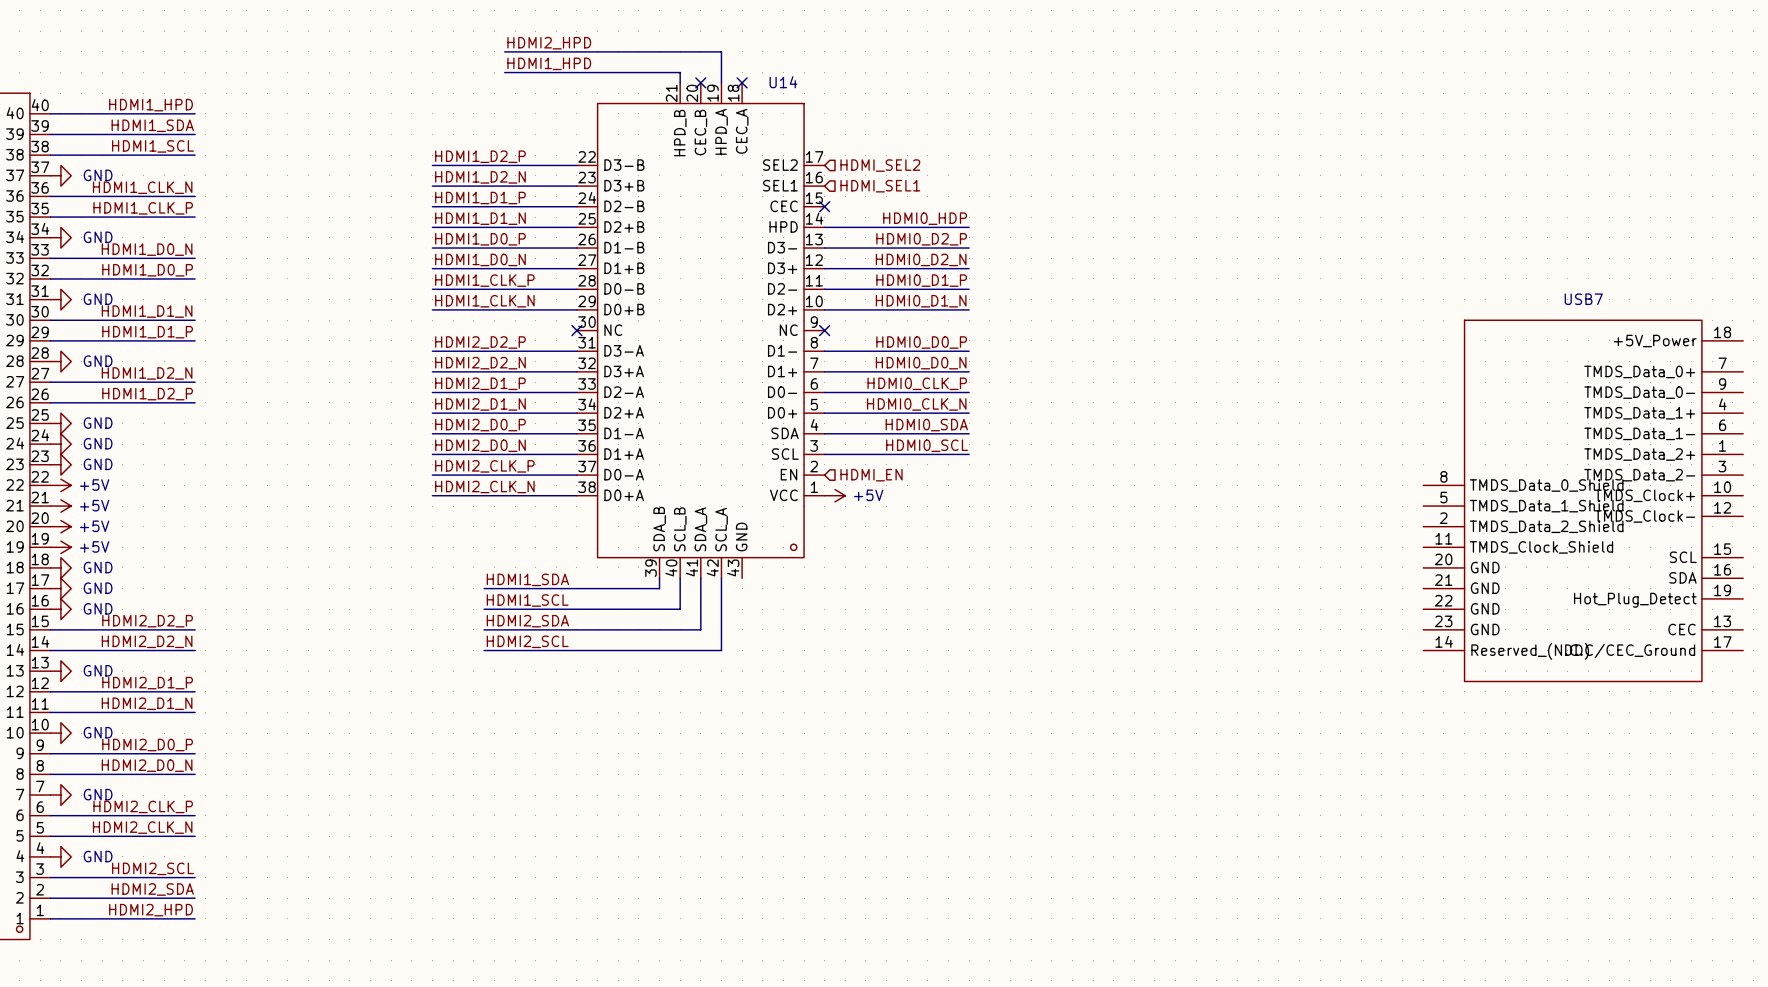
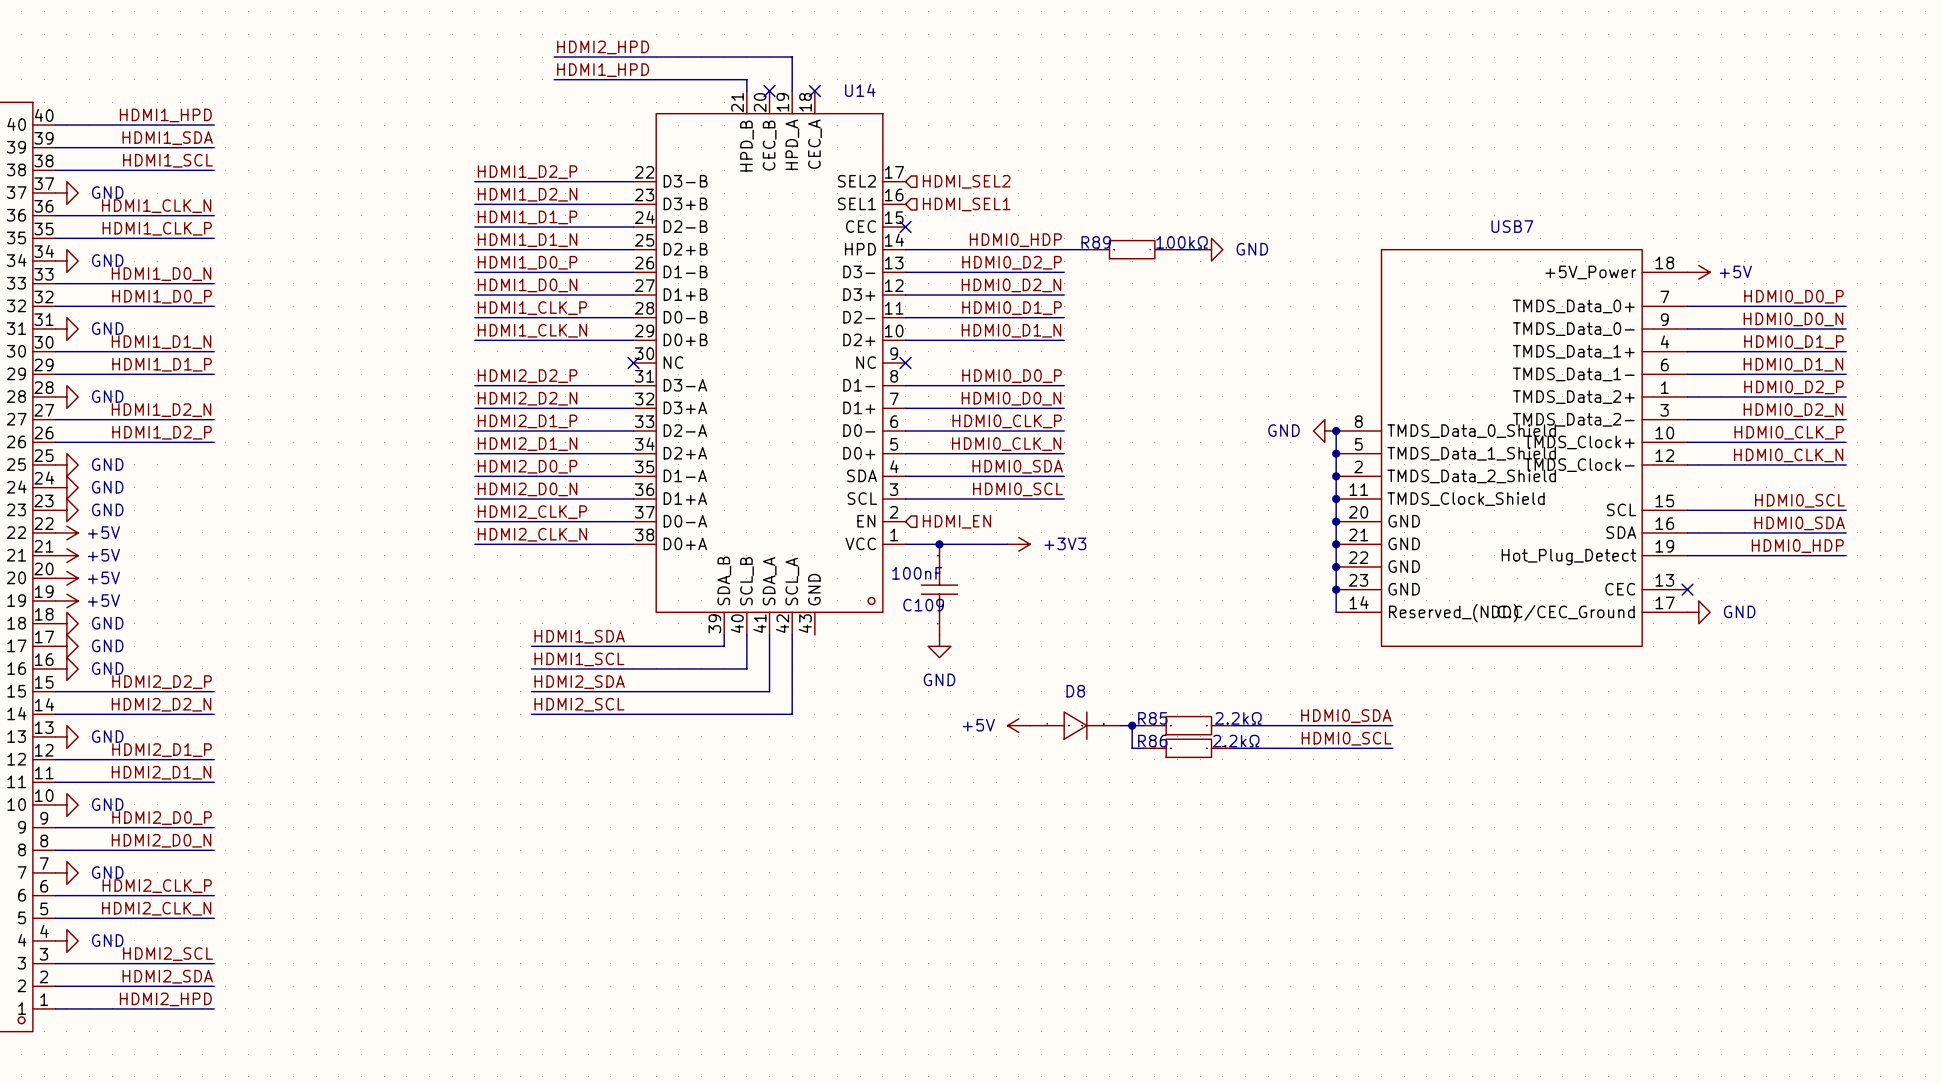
wire: none -> (1064, 249) (1086, 249)
R89: none -> 100kΩ (1132, 249)
wire: none -> (1177, 249) (1200, 249)
power symbol: none -> GND (1211, 249)
power symbol: none -> +5V (1698, 272)
label: none -> HDMI0_D0_P (1793, 296)
wire: none -> (1687, 306) (1846, 306)
label: none -> HDMI0_D0_N (1793, 319)
wire: none -> (1687, 328) (1846, 328)
label: none -> HDMI0_D1_P (1793, 342)
label: none -> HDMI0_D1_N (1793, 364)
wire: none -> (1687, 374) (1846, 374)
label: none -> HDMI0_D2_P (1793, 387)
wire: none -> (1687, 396) (1846, 396)
label: none -> HDMI0_D2_N (1793, 410)
wire: none -> (1687, 419) (1846, 419)
power symbol: none -> GND (1324, 430)
wire: none -> (1336, 430) (1336, 612)
junction: none -> (1336, 430)
label: none -> HDMI0_CLK_P (1789, 432)
wire: none -> (1687, 442) (1846, 442)
junction: none -> (1336, 453)
label: none -> HDMI0_CLK_N (1788, 455)
wire: none -> (1687, 464) (1846, 464)
junction: none -> (1336, 476)
junction: none -> (1336, 498)
label: none -> HDMI0_SCL (1799, 500)
wire: none -> (1687, 510) (1846, 510)
junction: none -> (1336, 521)
label: none -> HDMI0_SDA (1799, 523)
wire: none -> (1687, 532) (1846, 532)
wire: none -> (905, 544) (1007, 544)
power symbol rotation: 0° (834, 495) -> 180° (1018, 725)
power symbol position: +5V (834, 495) -> +5V (1018, 725)
junction: none -> (939, 544)
power symbol: none -> +3V3 (1018, 544)
junction: none -> (1336, 544)
label: none -> HDMI0_HDP (1797, 546)
USB7 position: (1583, 500) -> (1511, 447)
wire: none -> (1687, 555) (1846, 555)
junction: none -> (1336, 566)
C109: none -> 100nF (939, 589)
junction: none -> (1336, 589)
no-connect mark: none -> (1687, 589)
power symbol: none -> GND (1698, 612)
power symbol: none -> GND (939, 646)
label: none -> HDMI0_SDA (1346, 716)
D8: none -> (1075, 725)
wire: none -> (1120, 725) (1143, 725)
wire: none -> (1132, 725) (1132, 748) (1143, 748)
junction: none -> (1132, 725)
R85: none -> 2.2kΩ (1188, 725)
wire: none -> (1234, 725) (1392, 725)
label: none -> HDMI0_SCL (1346, 738)
R86: none -> 2.2kΩ (1188, 748)
wire: none -> (1234, 748) (1392, 748)

